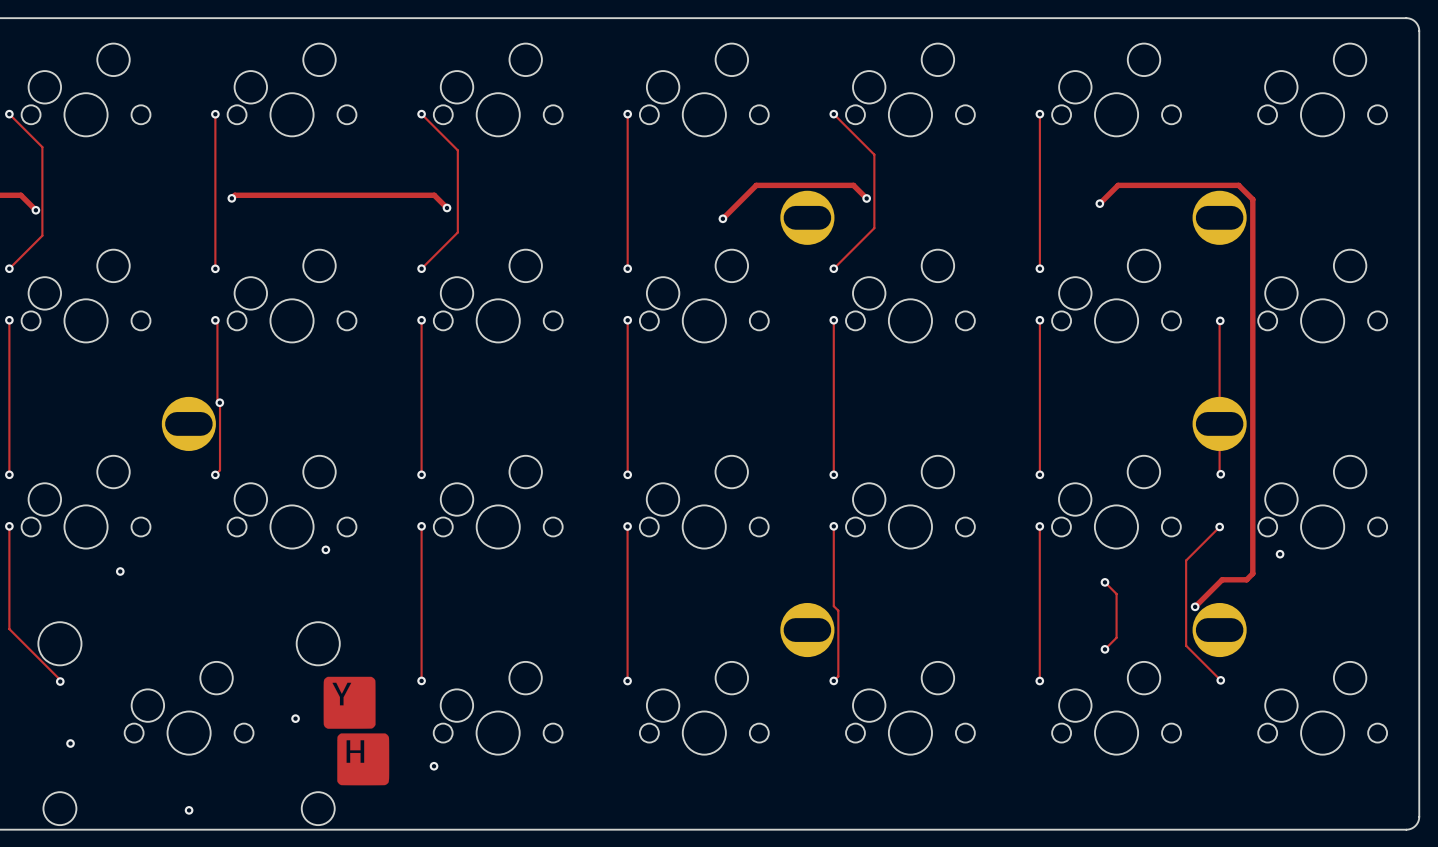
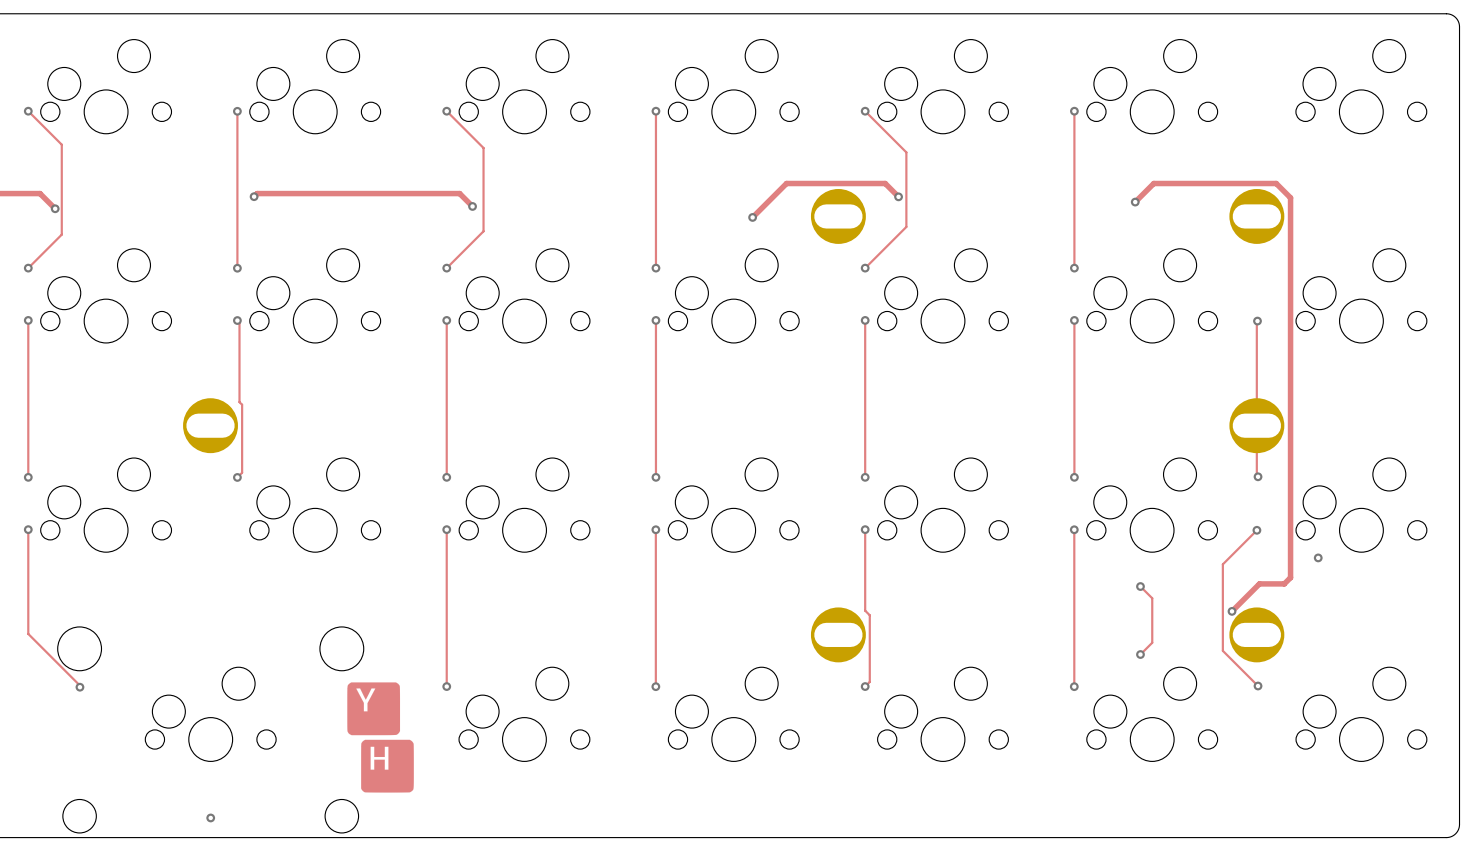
via: (219, 402) -> none
via: (325, 549) -> none
via: (120, 571) -> none
via: (295, 718) -> none
via: (70, 743) -> none
via: (434, 766) -> none

